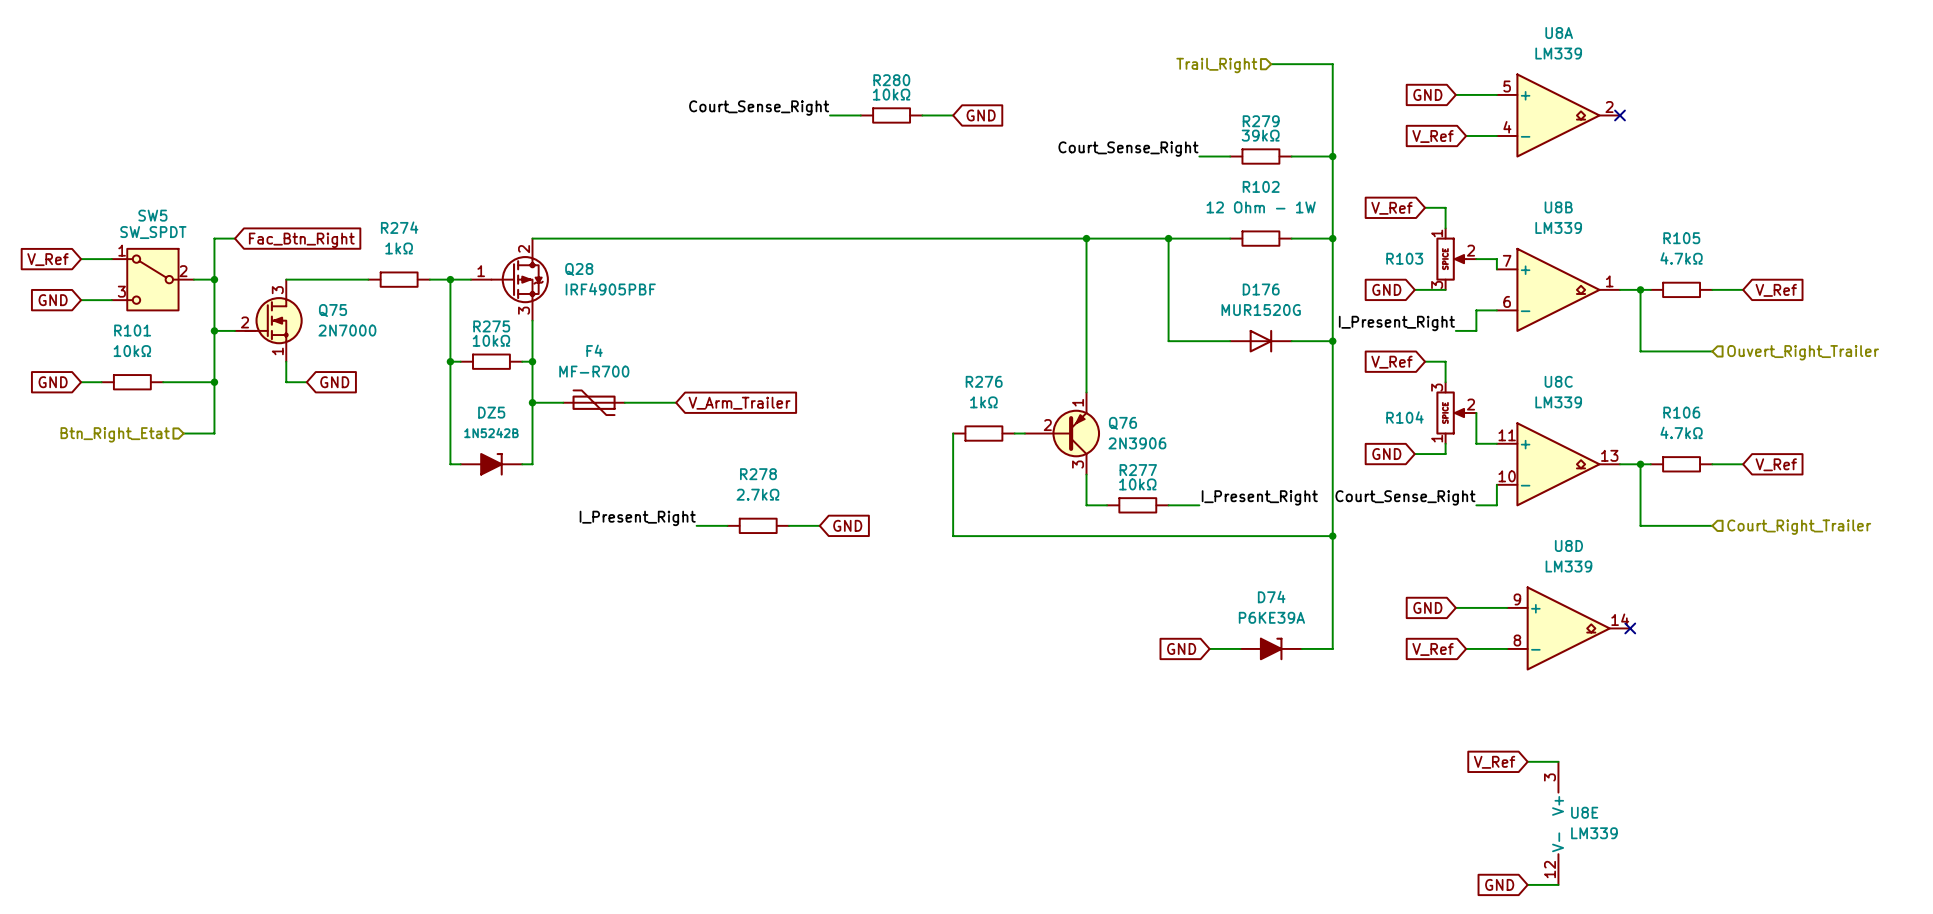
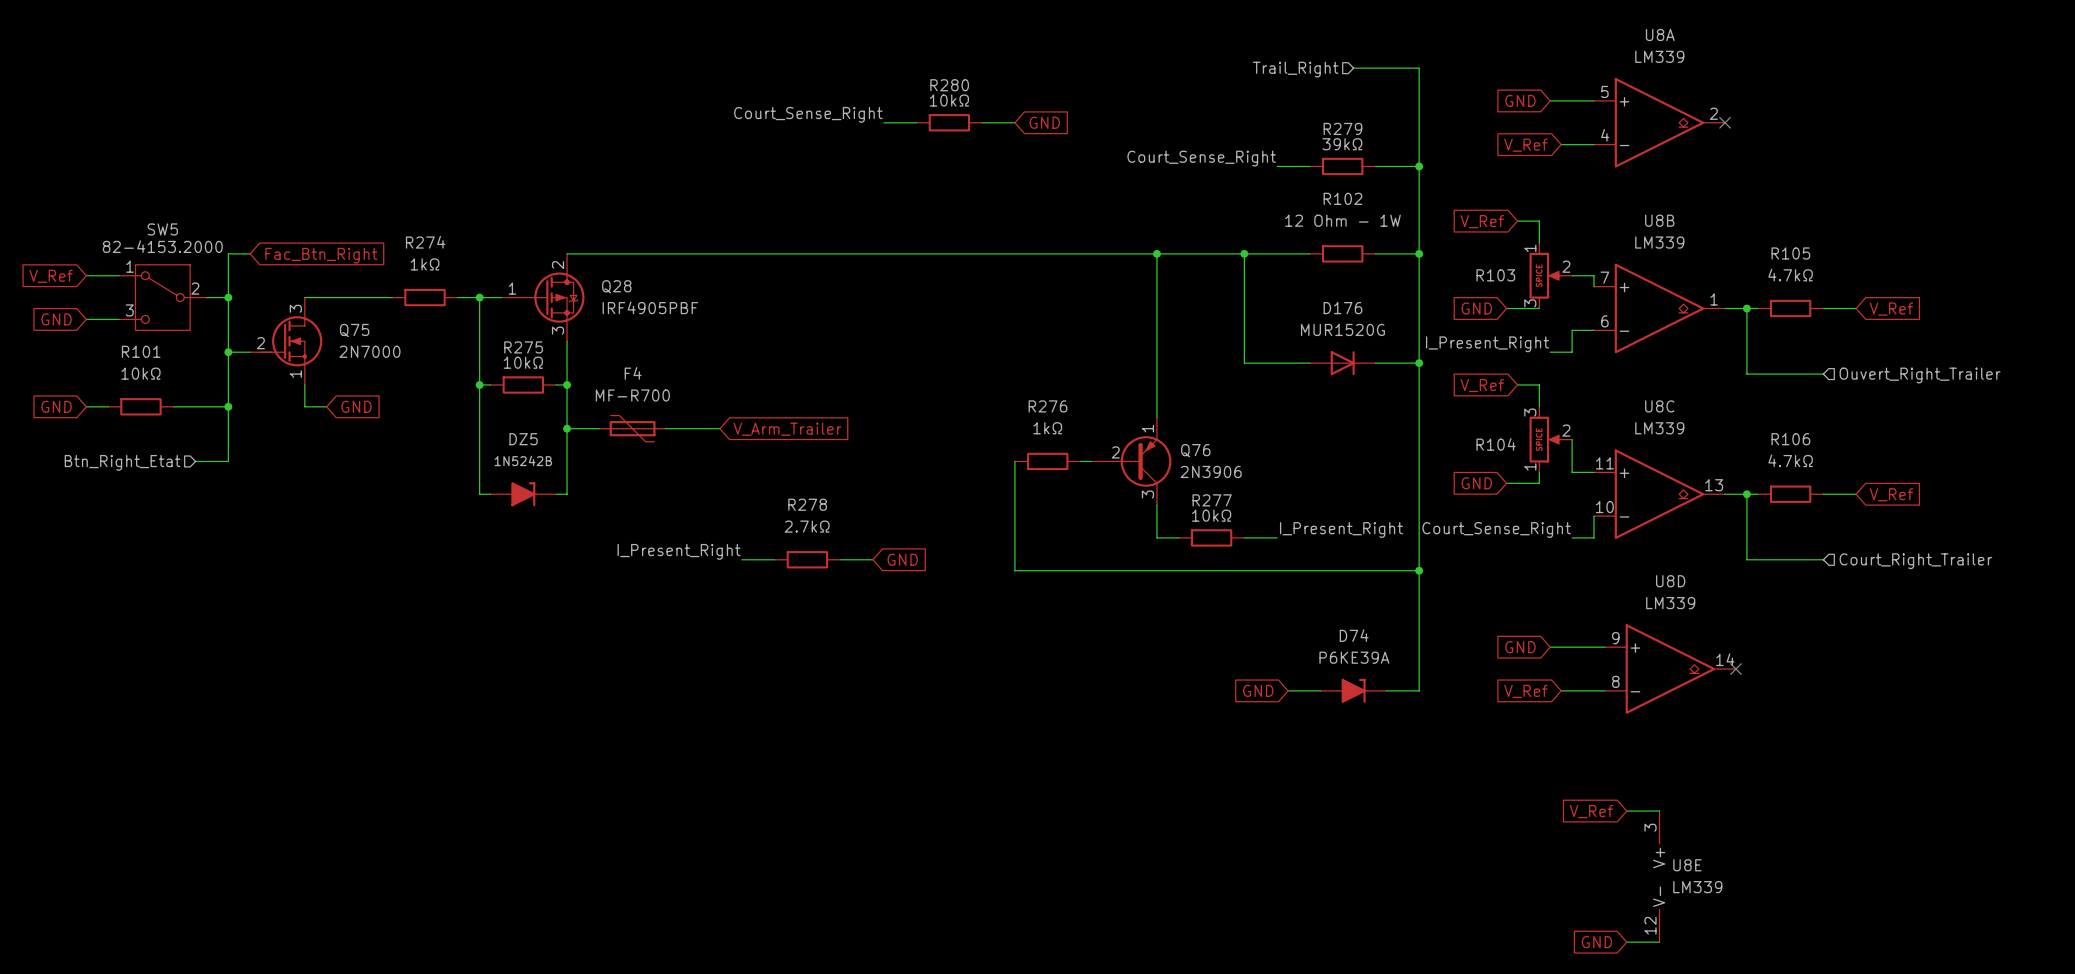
SW5 value: SW_SPDT (153, 232) -> 82-4153.2000 (162, 246)

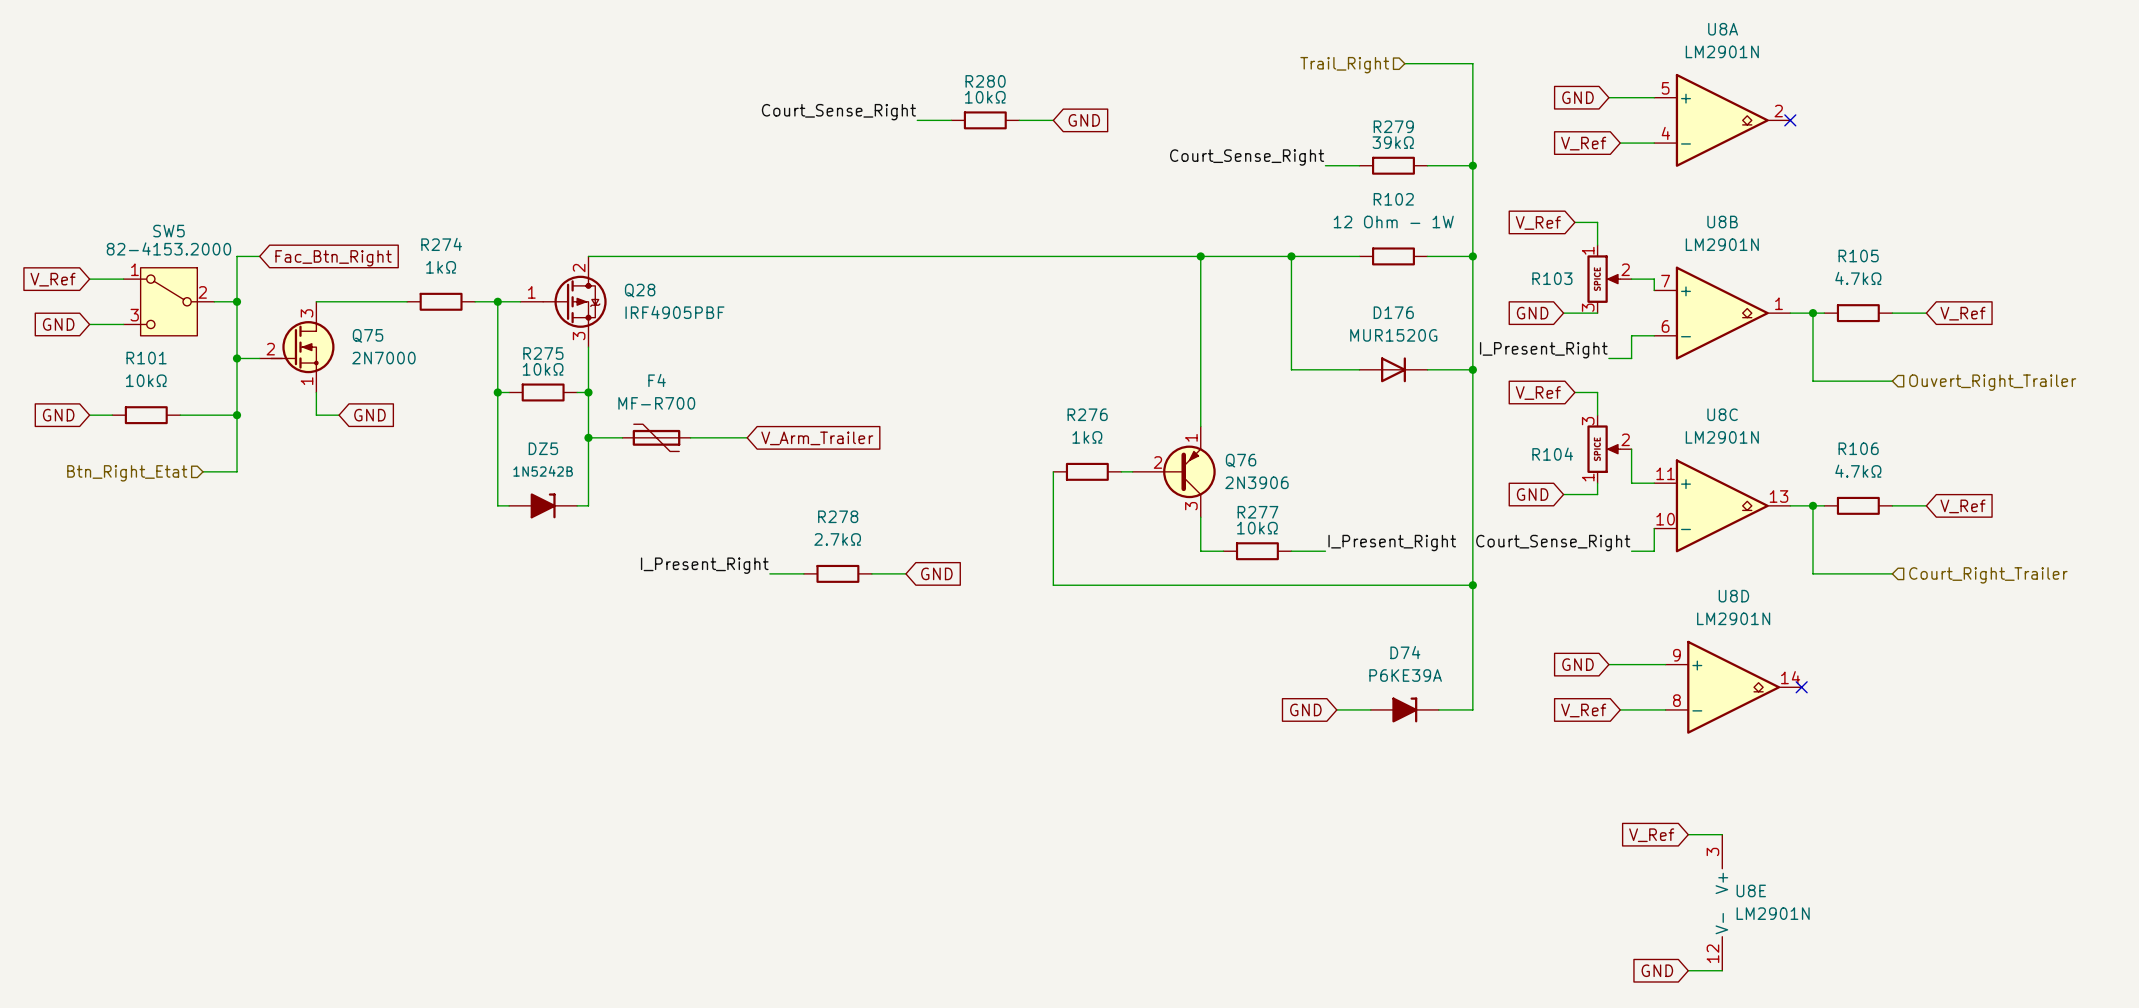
U8A value: LM339 (1659, 56) -> LM2901N (1722, 51)
U8B value: LM339 (1659, 242) -> LM2901N (1722, 244)
U8C value: LM339 (1659, 428) -> LM2901N (1722, 437)
U8D value: LM339 (1670, 603) -> LM2901N (1733, 618)
U8E value: LM339 (1697, 887) -> LM2901N (1773, 913)

